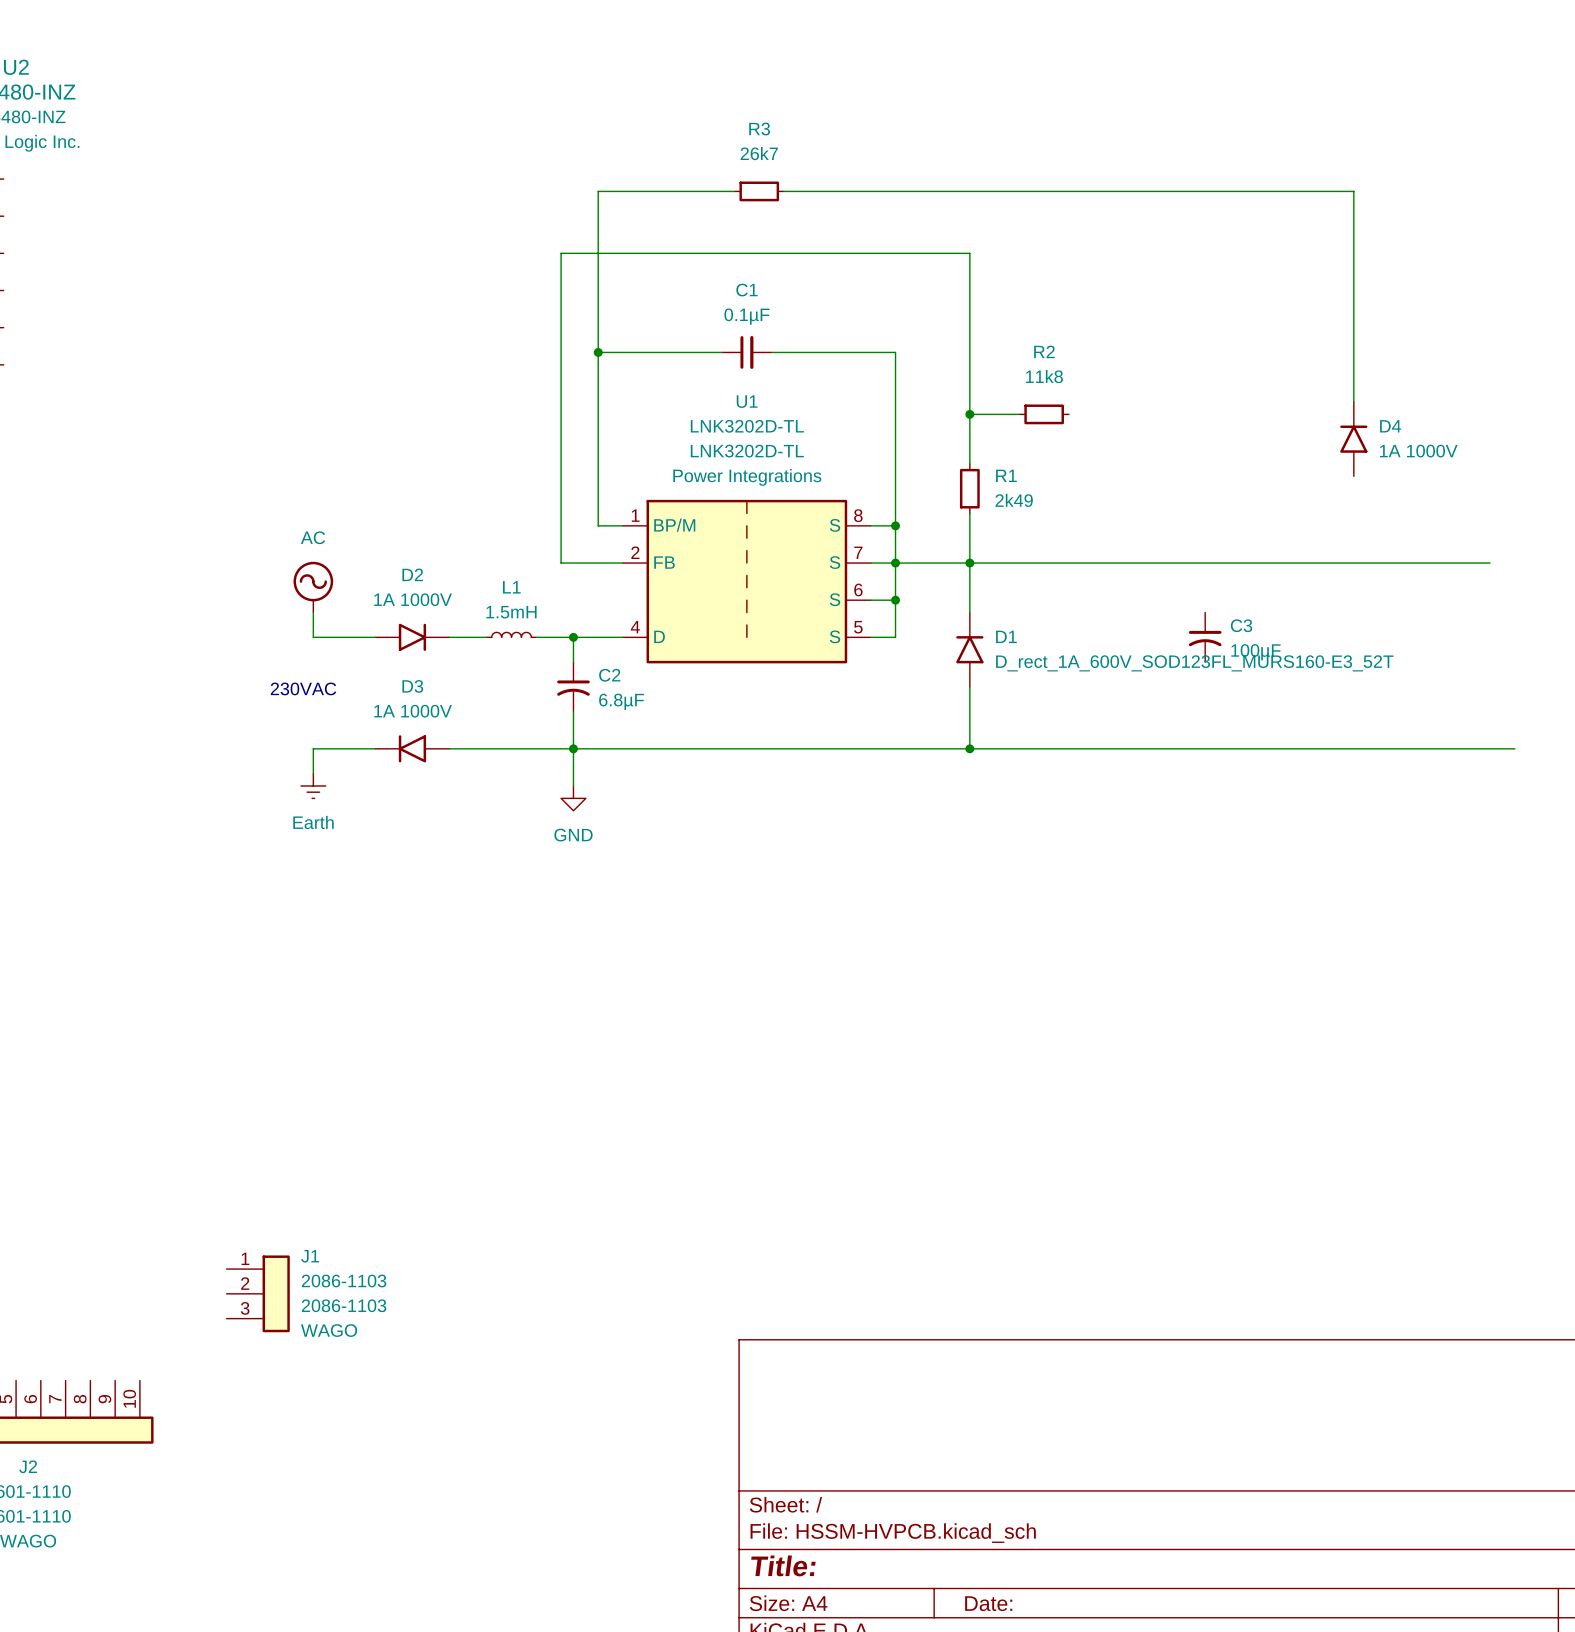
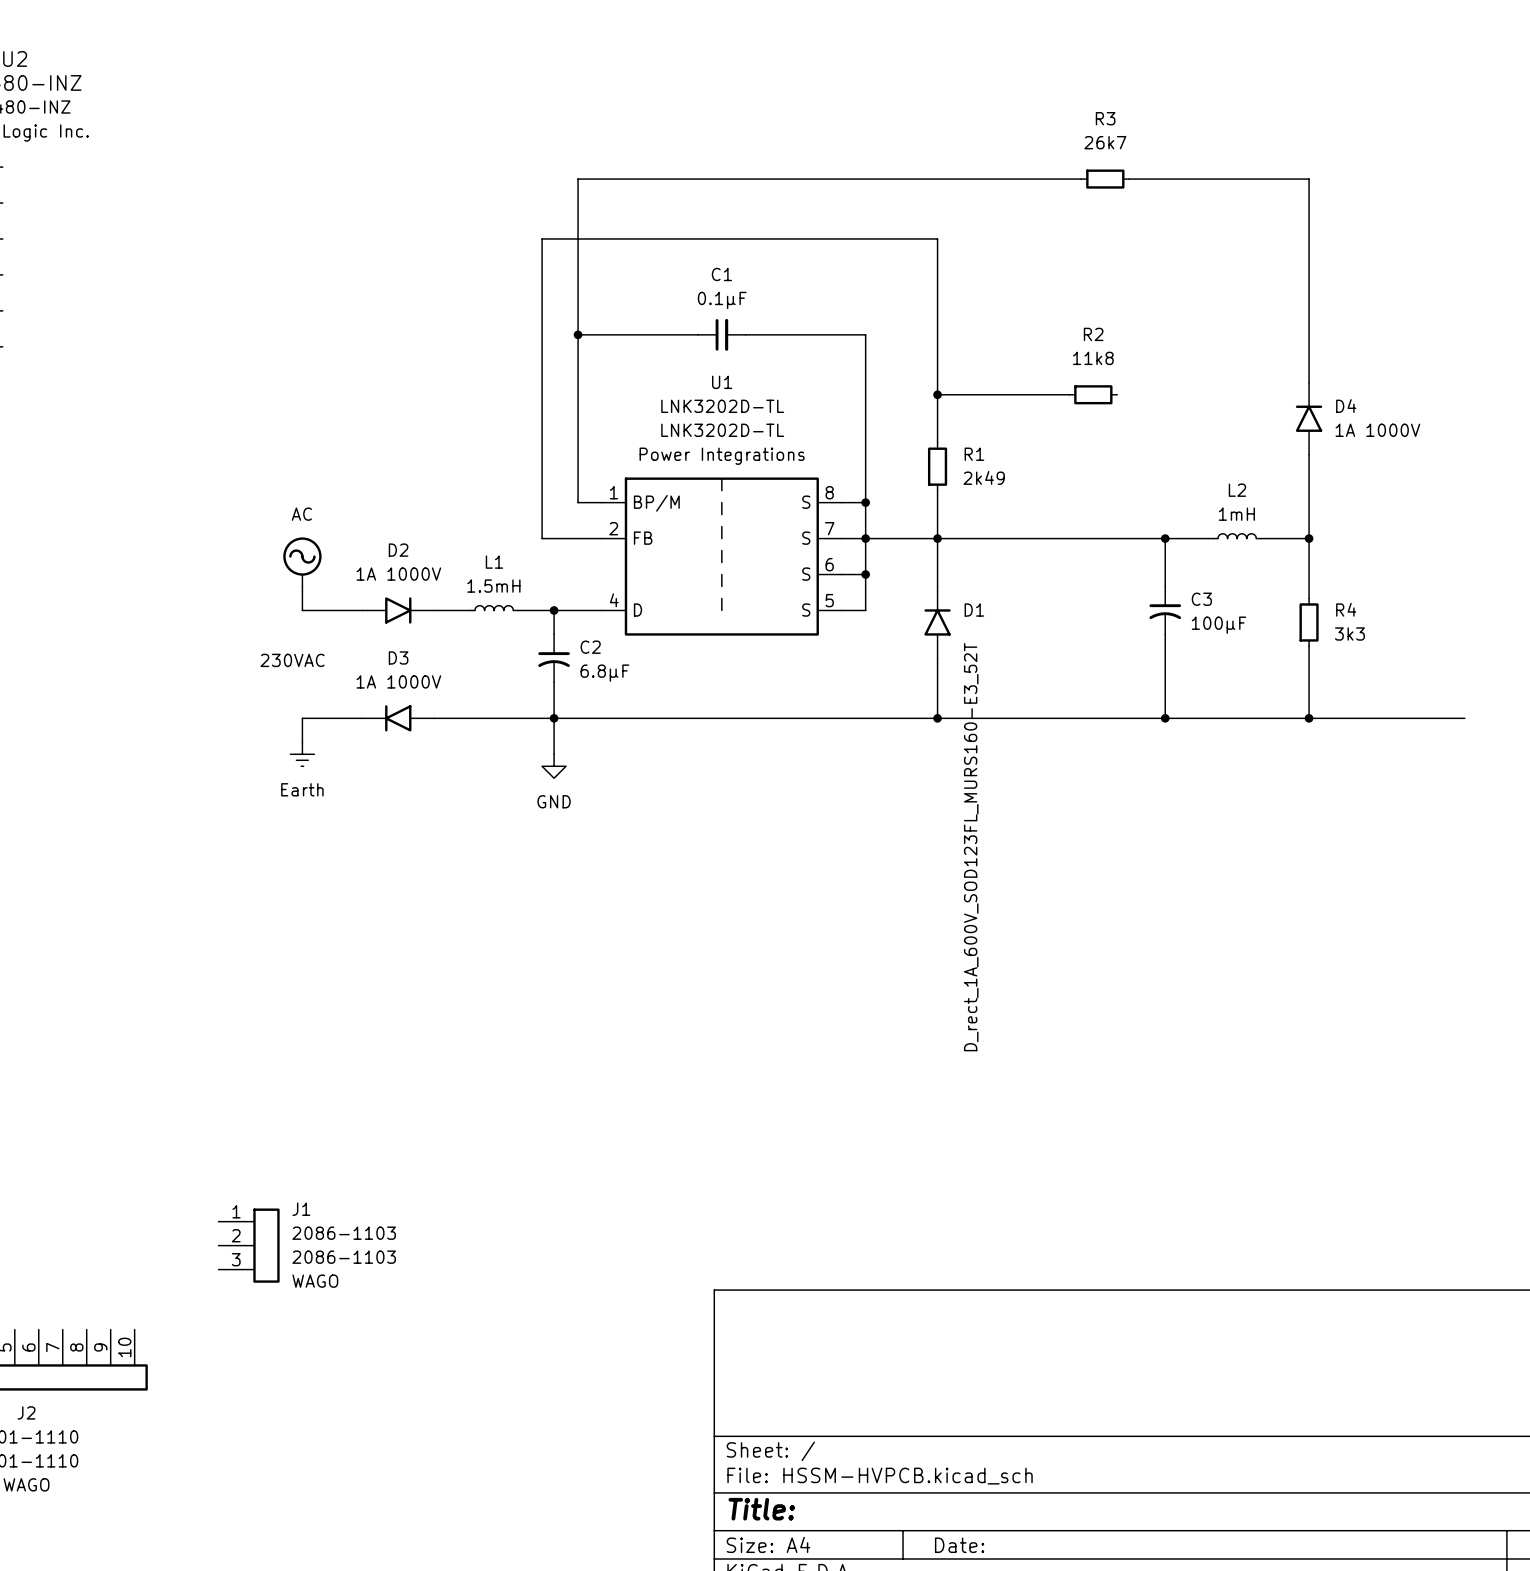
wire: none -> (709, 179) (757, 179)
R3 position: (759, 191) -> (1105, 179)
wire: (1118, 191) (1168, 191) -> none
wire: none -> (985, 394) (1069, 394)
R2 position: (1044, 414) -> (1093, 394)
wire: none -> (1309, 454) (1309, 598)
L2: none -> (1237, 536)
wire: none -> (1165, 538) (1165, 586)
junction: none -> (1165, 538)
wire: (1254, 563) (1304, 563) -> none
wire: (1353, 563) (1490, 563) -> none
junction: none -> (1309, 538)
R4: none -> (1309, 622)
wire: none -> (1165, 634) (1165, 718)
D1 text rotation: 0° (1194, 663) -> 90° counterclockwise (971, 847)
wire: none -> (1309, 646) (1309, 718)
junction: none -> (1165, 718)
junction: none -> (1309, 718)

